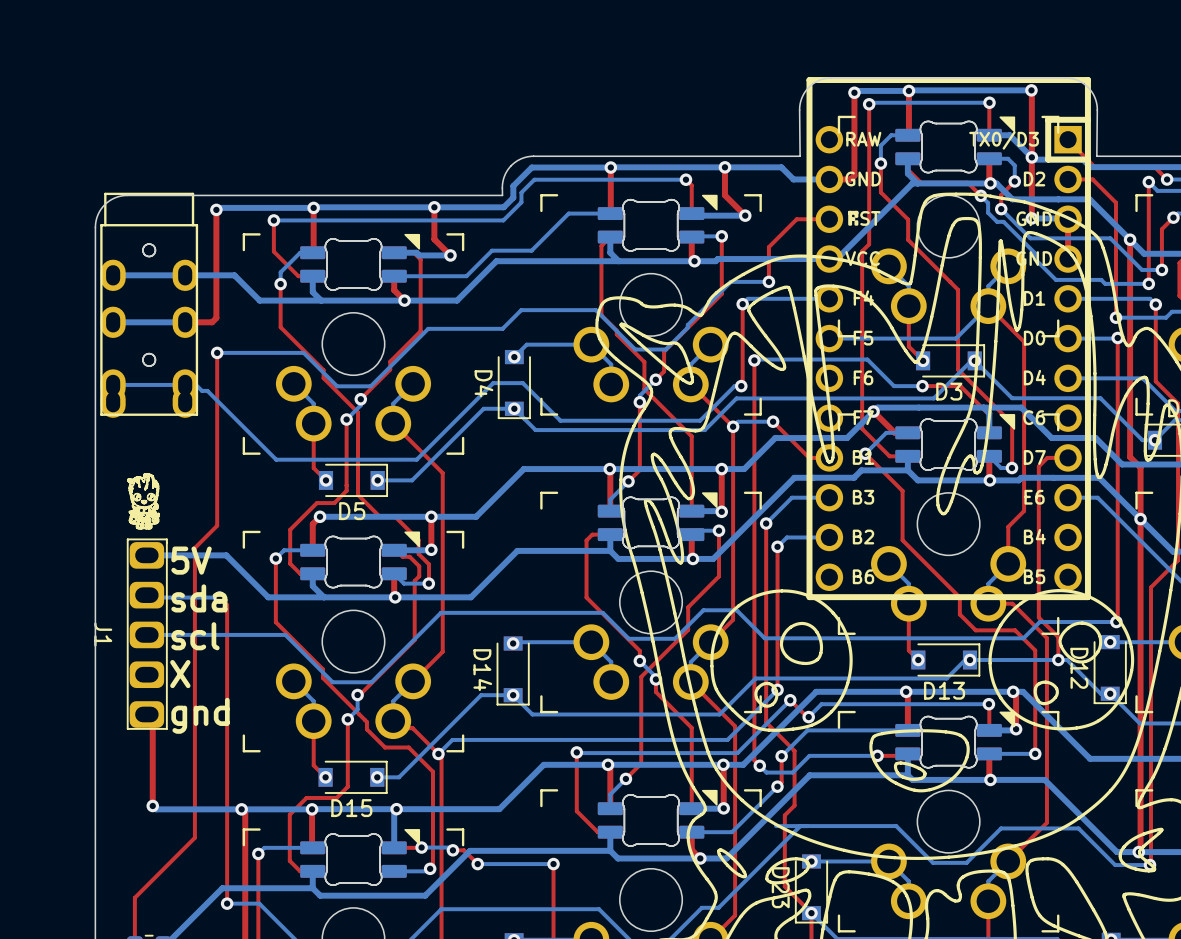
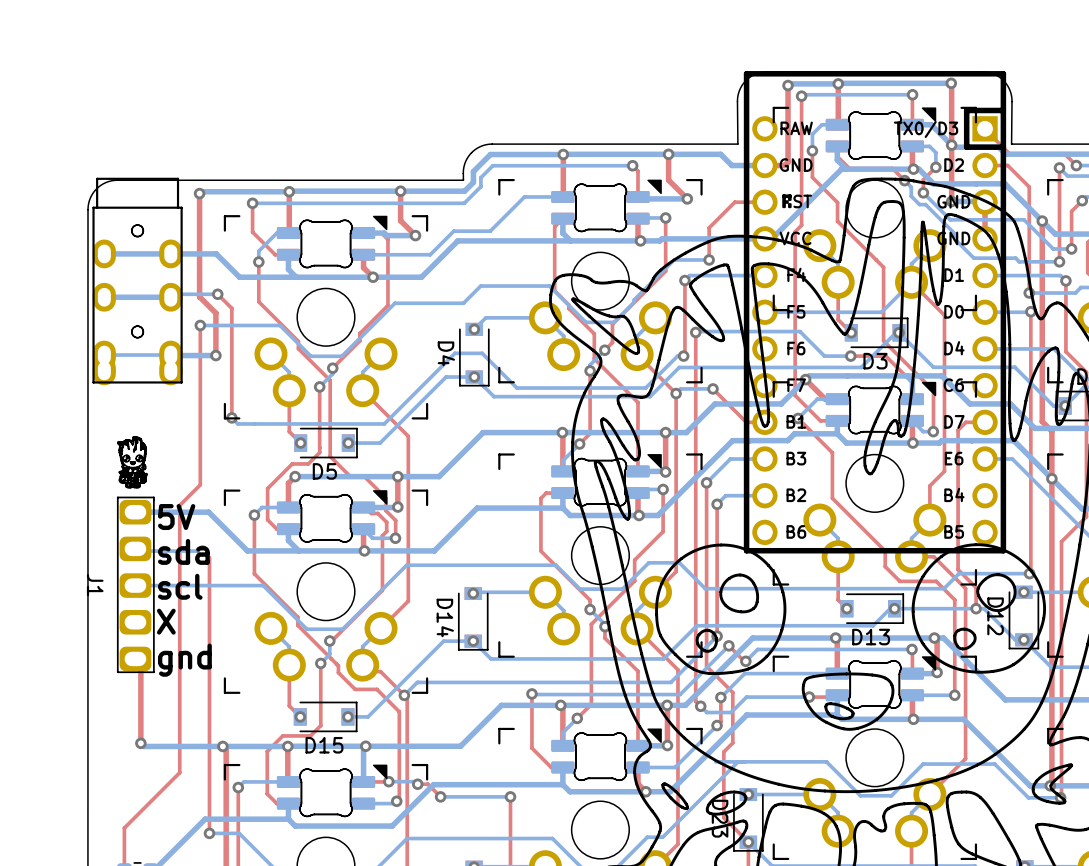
top track: (216, 318) (212, 322) (185, 322) -> (199, 293) (199, 296) (215, 313) (215, 355)
bottom track: none -> (217, 294) (173, 294) (170, 297)
top track: none -> (217, 294) (231, 308) (231, 417)
via: none -> (217, 294)
bottom track: (192, 381) (201, 390) (207, 390) (276, 459) -> (231, 417) (237, 423) (254, 423)
bottom track: none -> (170, 355) (215, 355)
via: none -> (215, 355)
via: none -> (231, 417)

